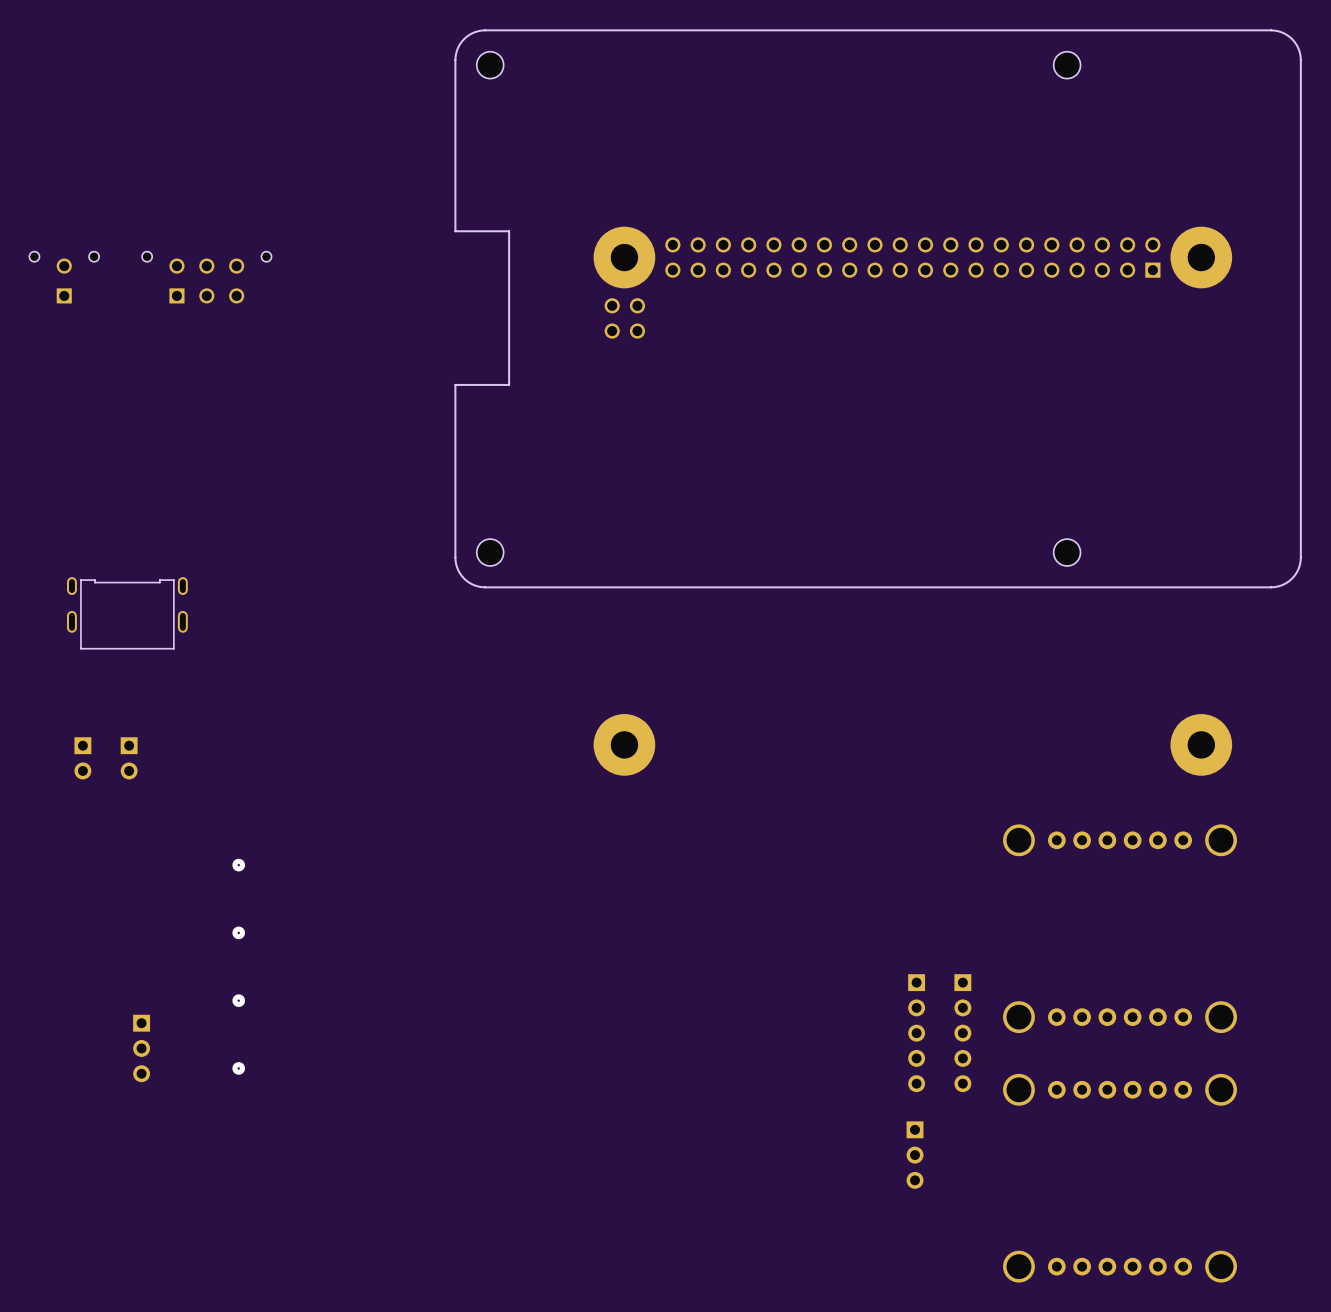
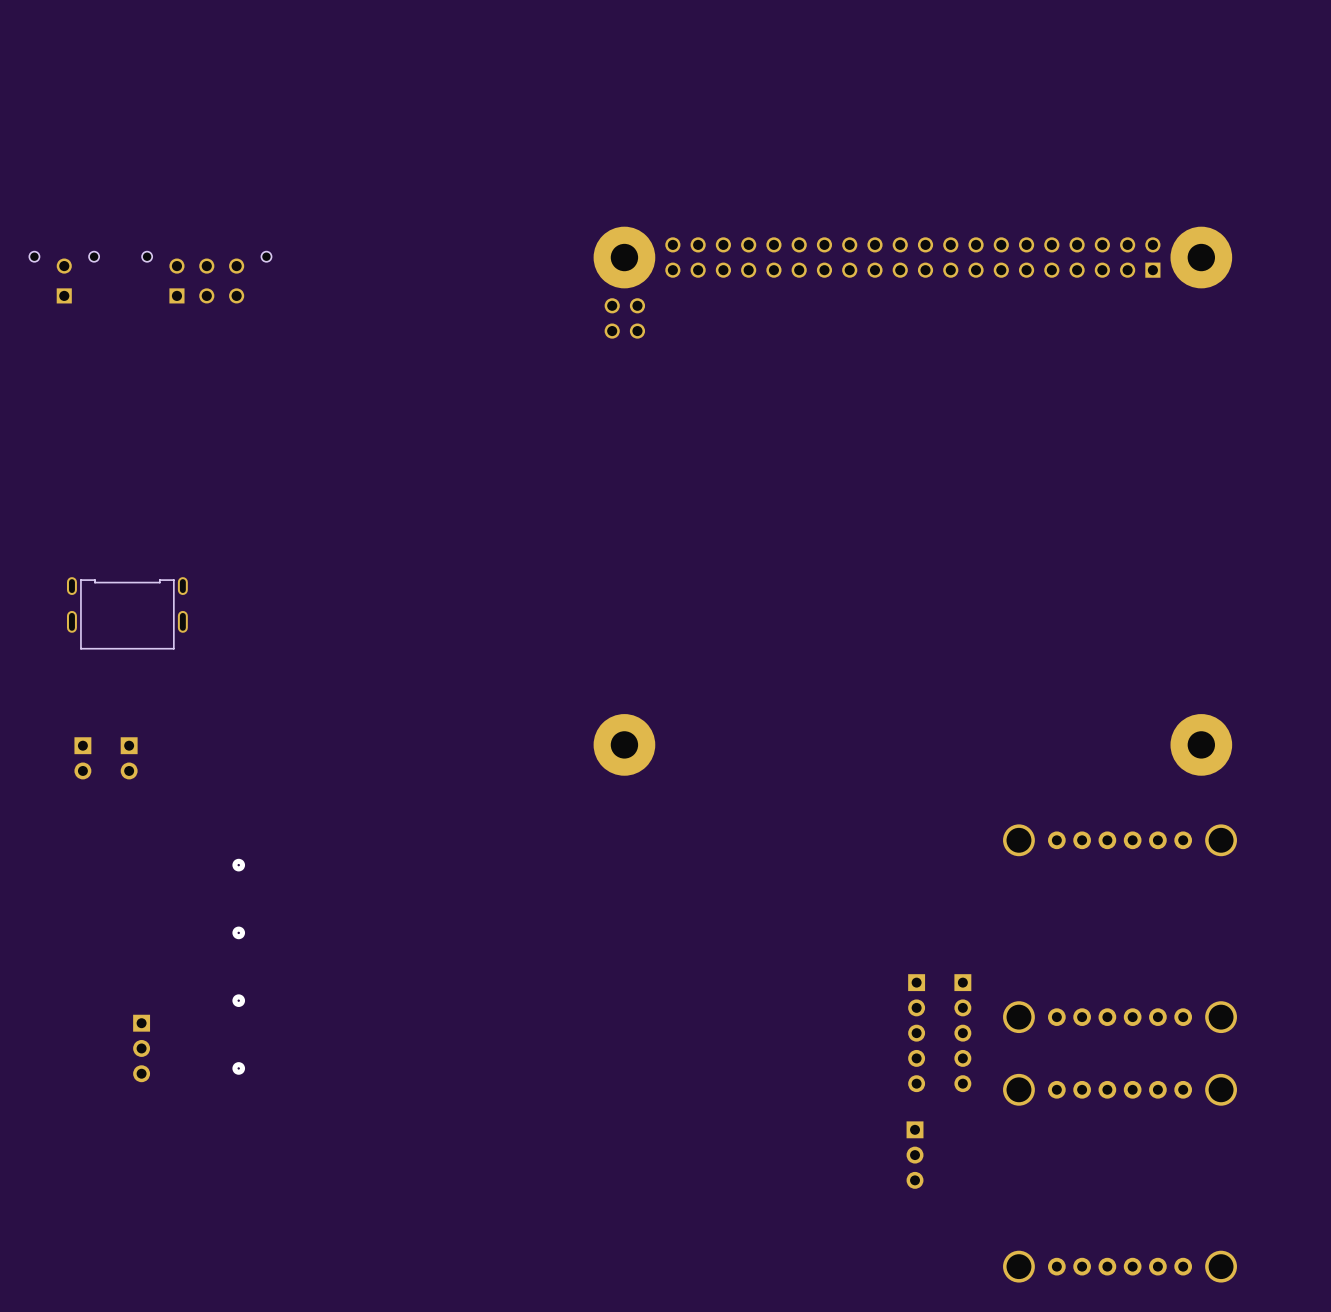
board edge: (1271, 30) (485, 30) (469, 34) (459, 44) (455, 56) (455, 231) (509, 231) (509, 384) (455, 384) (455, 557) (459, 573) (472, 584) (485, 587) (1271, 587) (1278, 586) (1289, 581) (1296, 572) (1300, 557) (1300, 60) (1298, 48) (1292, 39) (1282, 32) (1271, 30) -> none
part: (490, 65) -> none
part: (1067, 65) -> none
part: (490, 552) -> none
part: (1067, 552) -> none

